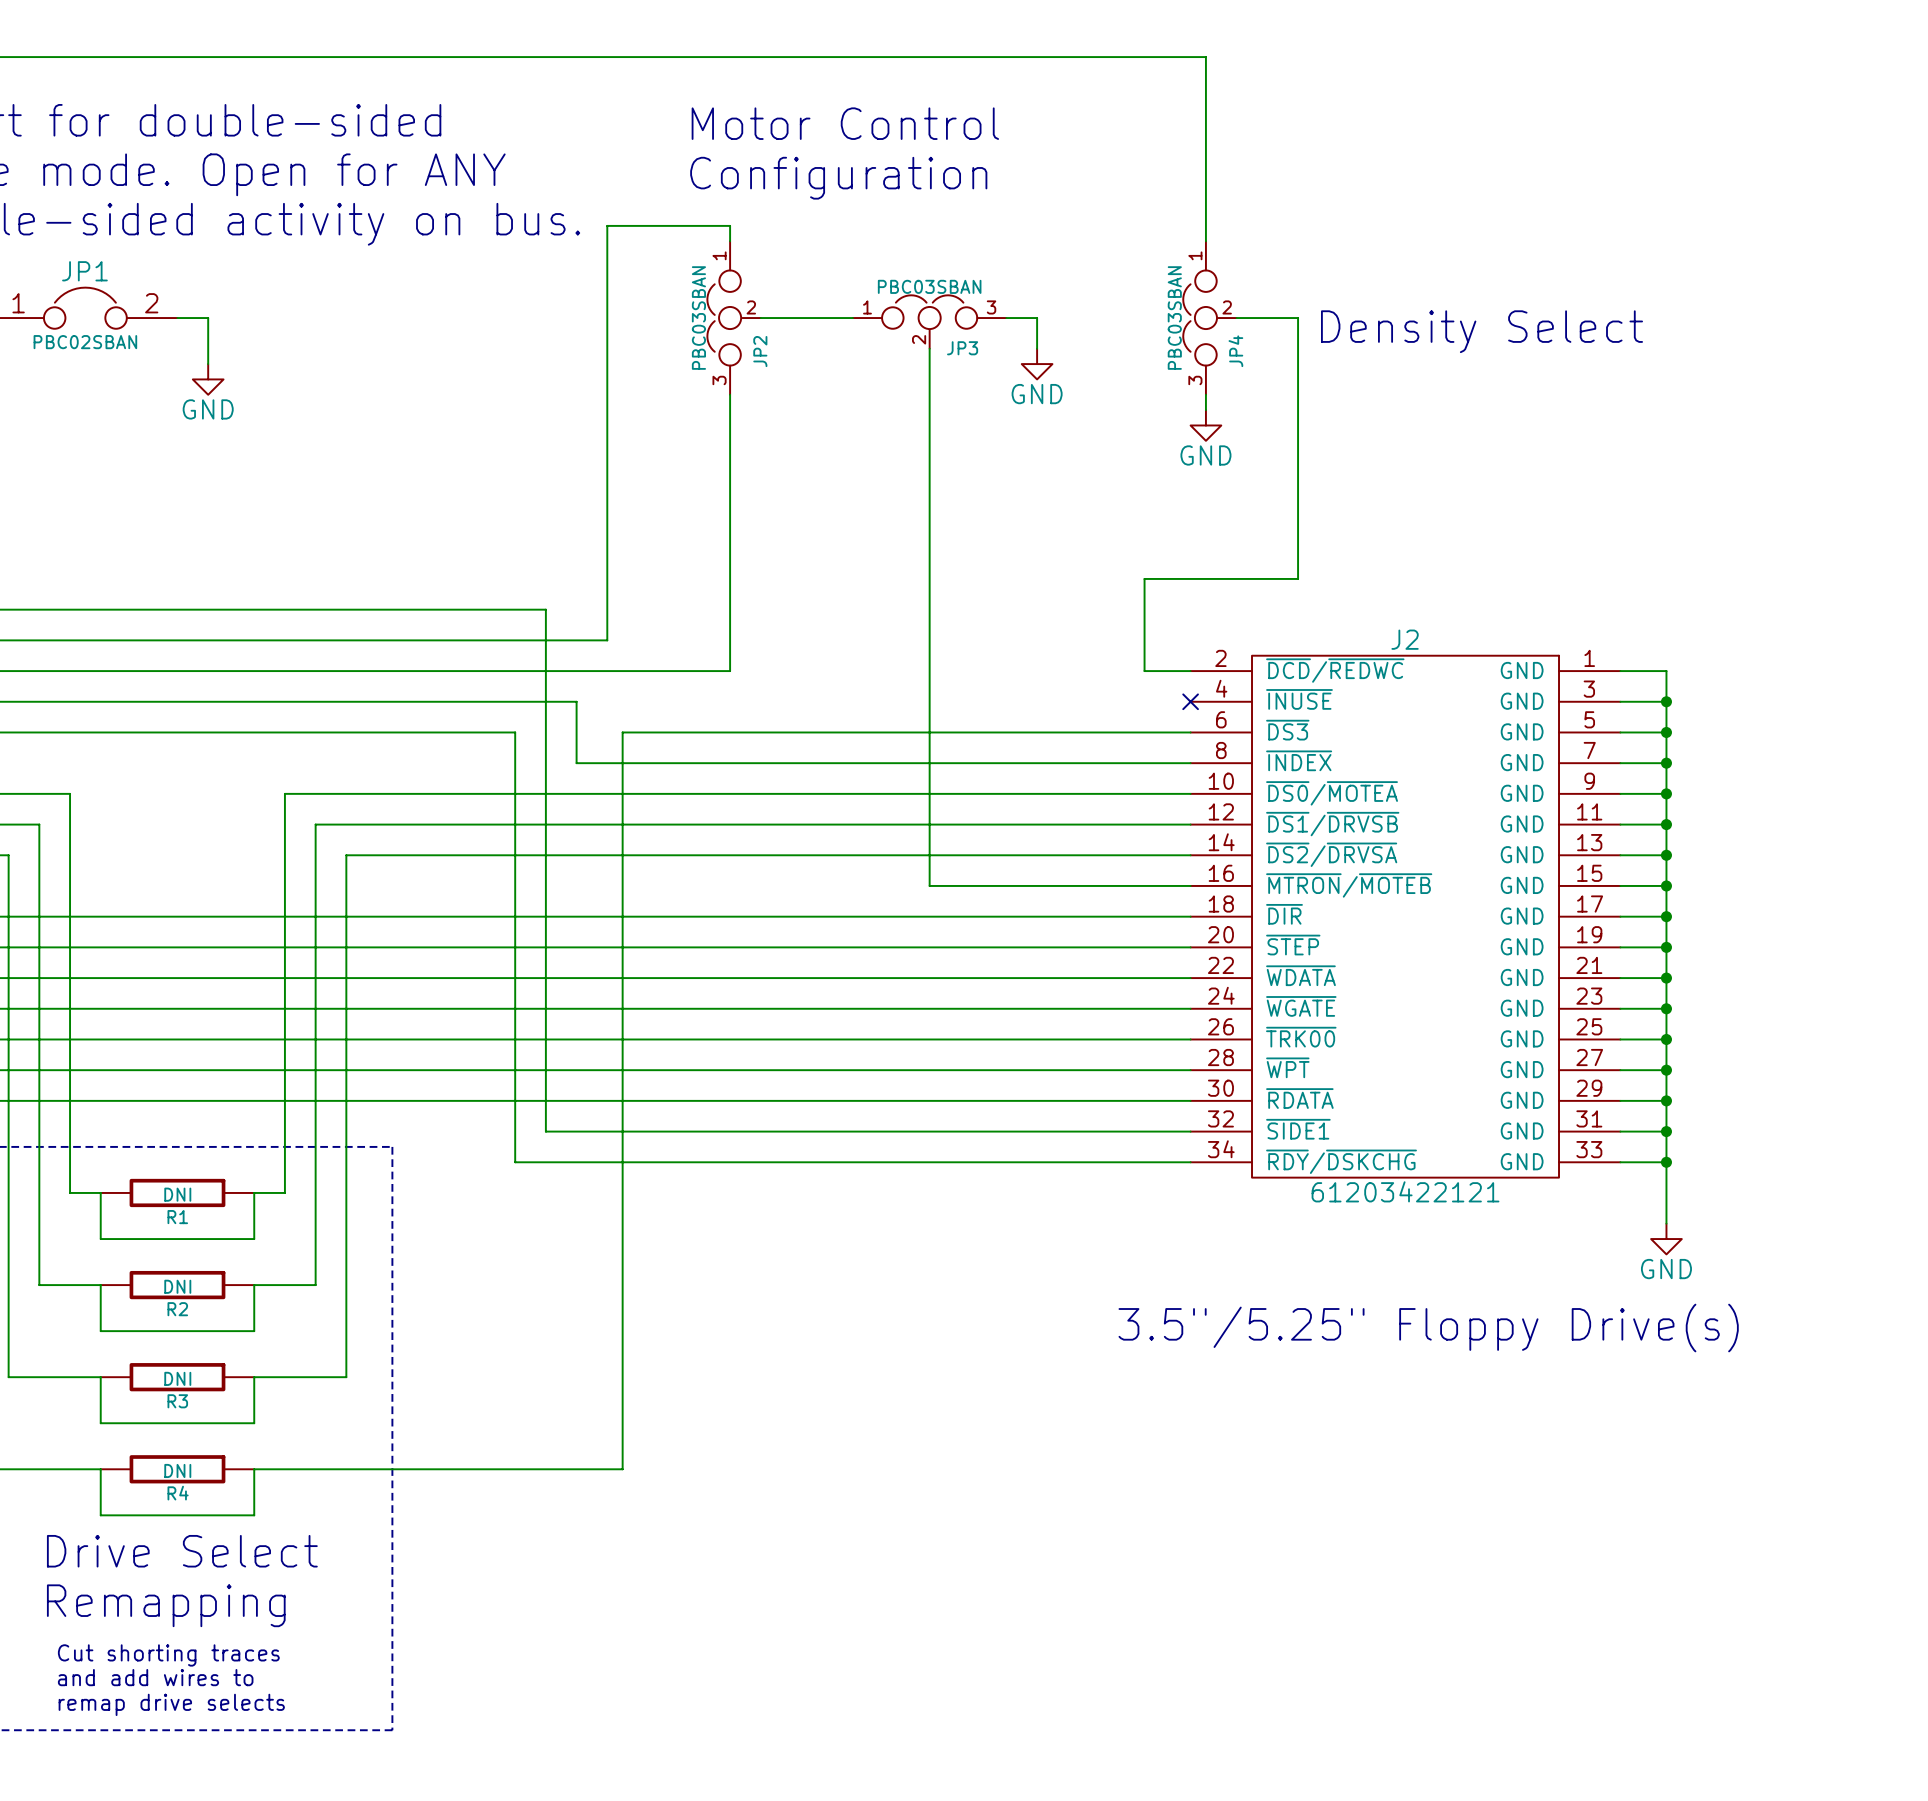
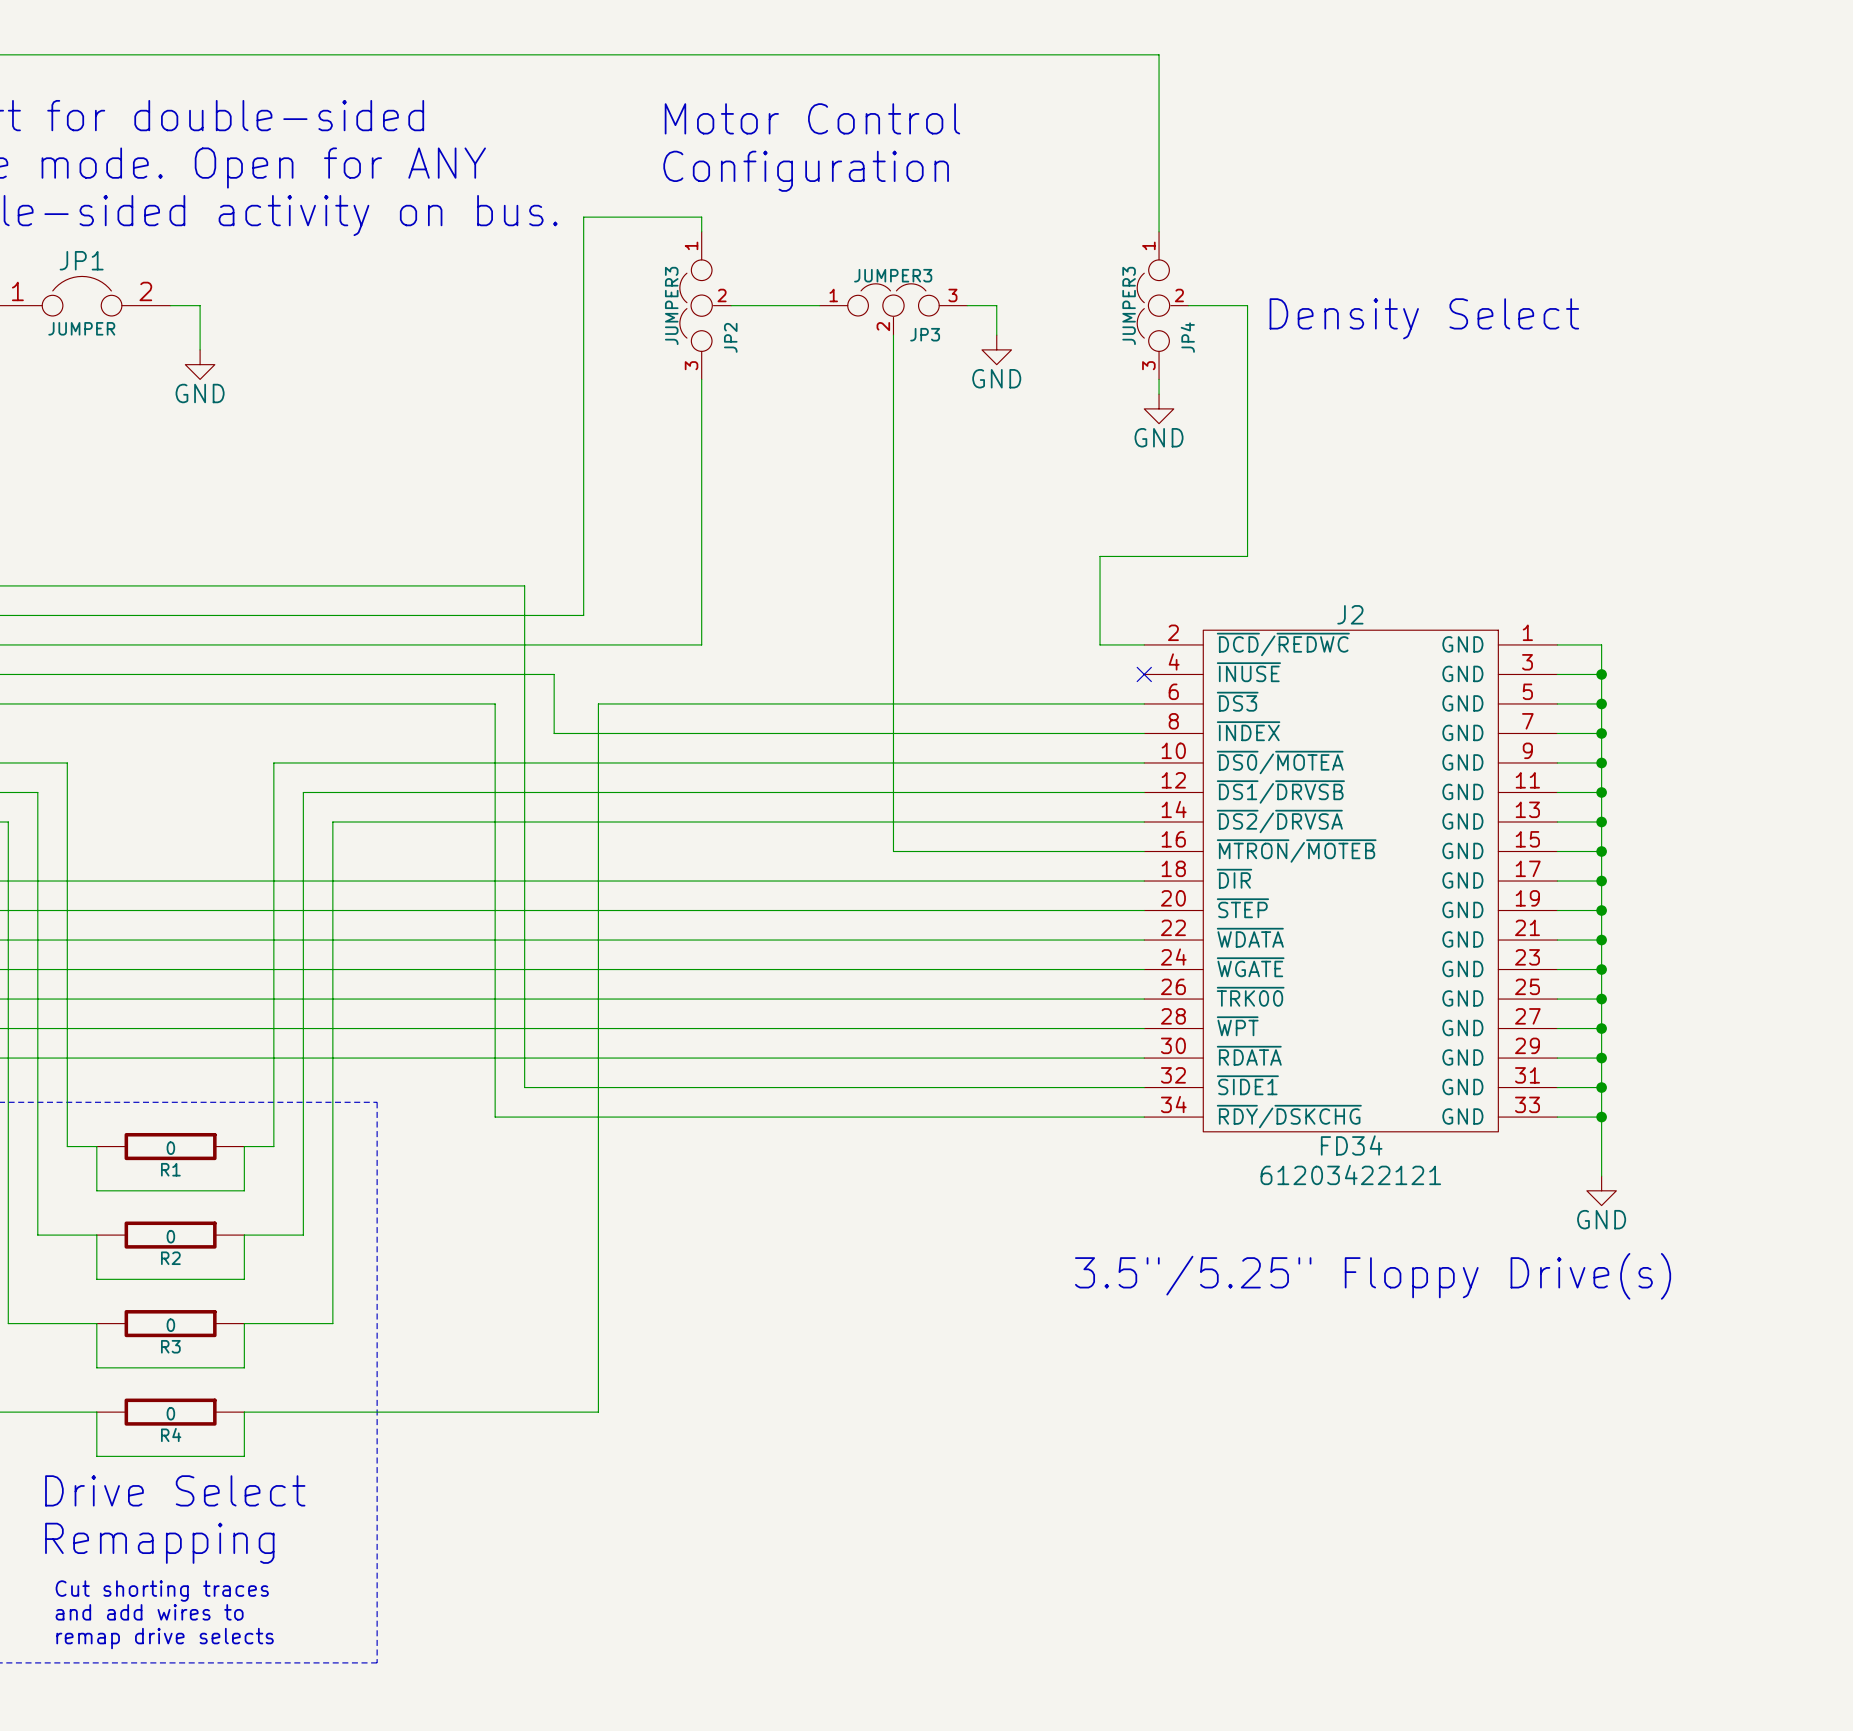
JP3 value: PBC03SBAN (929, 286) -> JUMPER3 (893, 275)
JP2 value: PBC03SBAN (698, 318) -> JUMPER3 (671, 305)
JP4 value: PBC03SBAN (1174, 318) -> JUMPER3 (1129, 305)
JP1 value: PBC02SBAN (85, 342) -> JUMPER (81, 328)
J2 value: 61203422121 (1405, 1191) -> FD34 (1351, 1145)
R1 value: DNI (177, 1194) -> 0 (170, 1148)
J2 text: none -> 61203422121 (1350, 1174)
R2 value: DNI (177, 1286) -> 0 (170, 1236)
R3 value: DNI (177, 1378) -> 0 (170, 1325)
R4 value: DNI (177, 1470) -> 0 (170, 1413)

